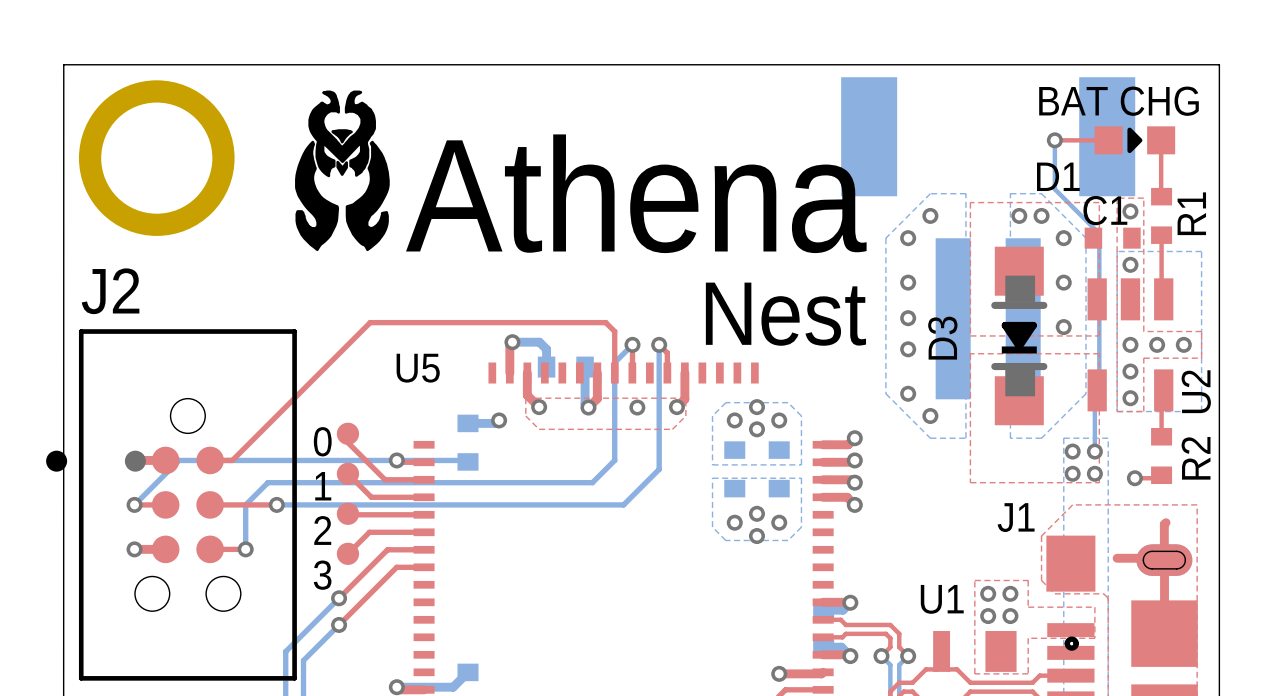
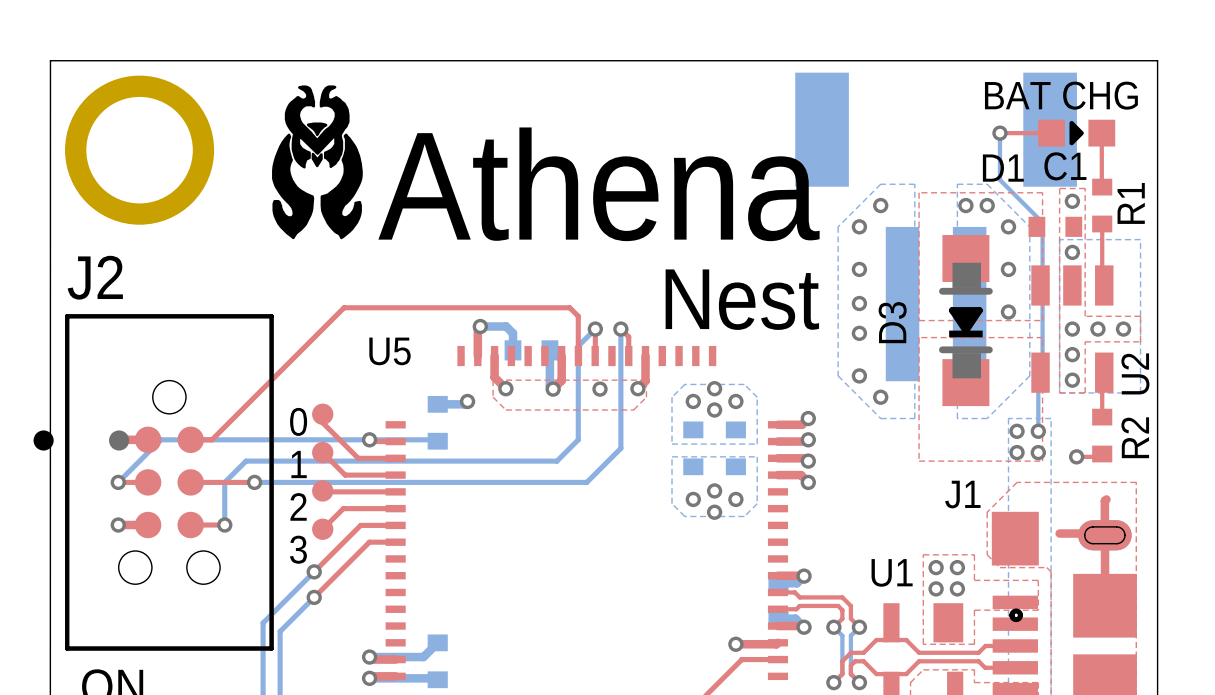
C1 name position: C1 (1105, 210) -> C1 (1065, 166)

